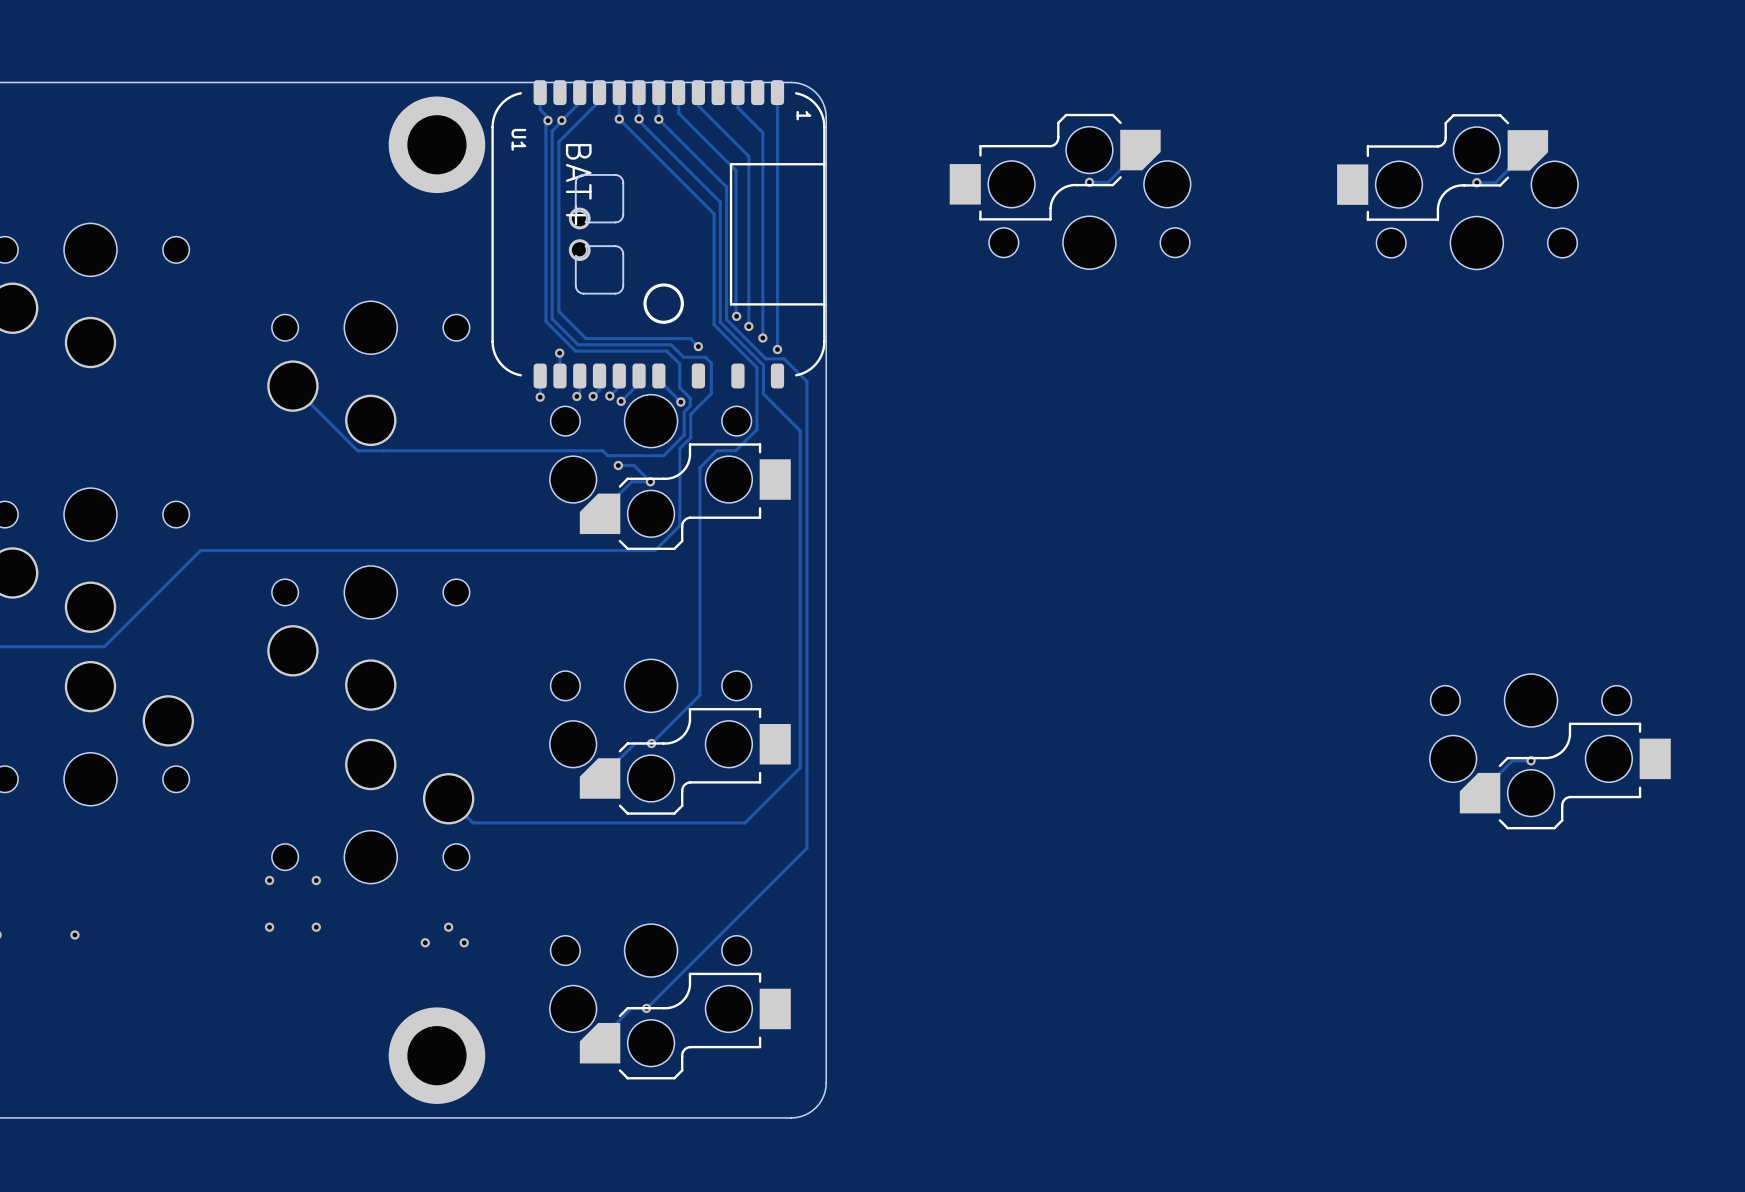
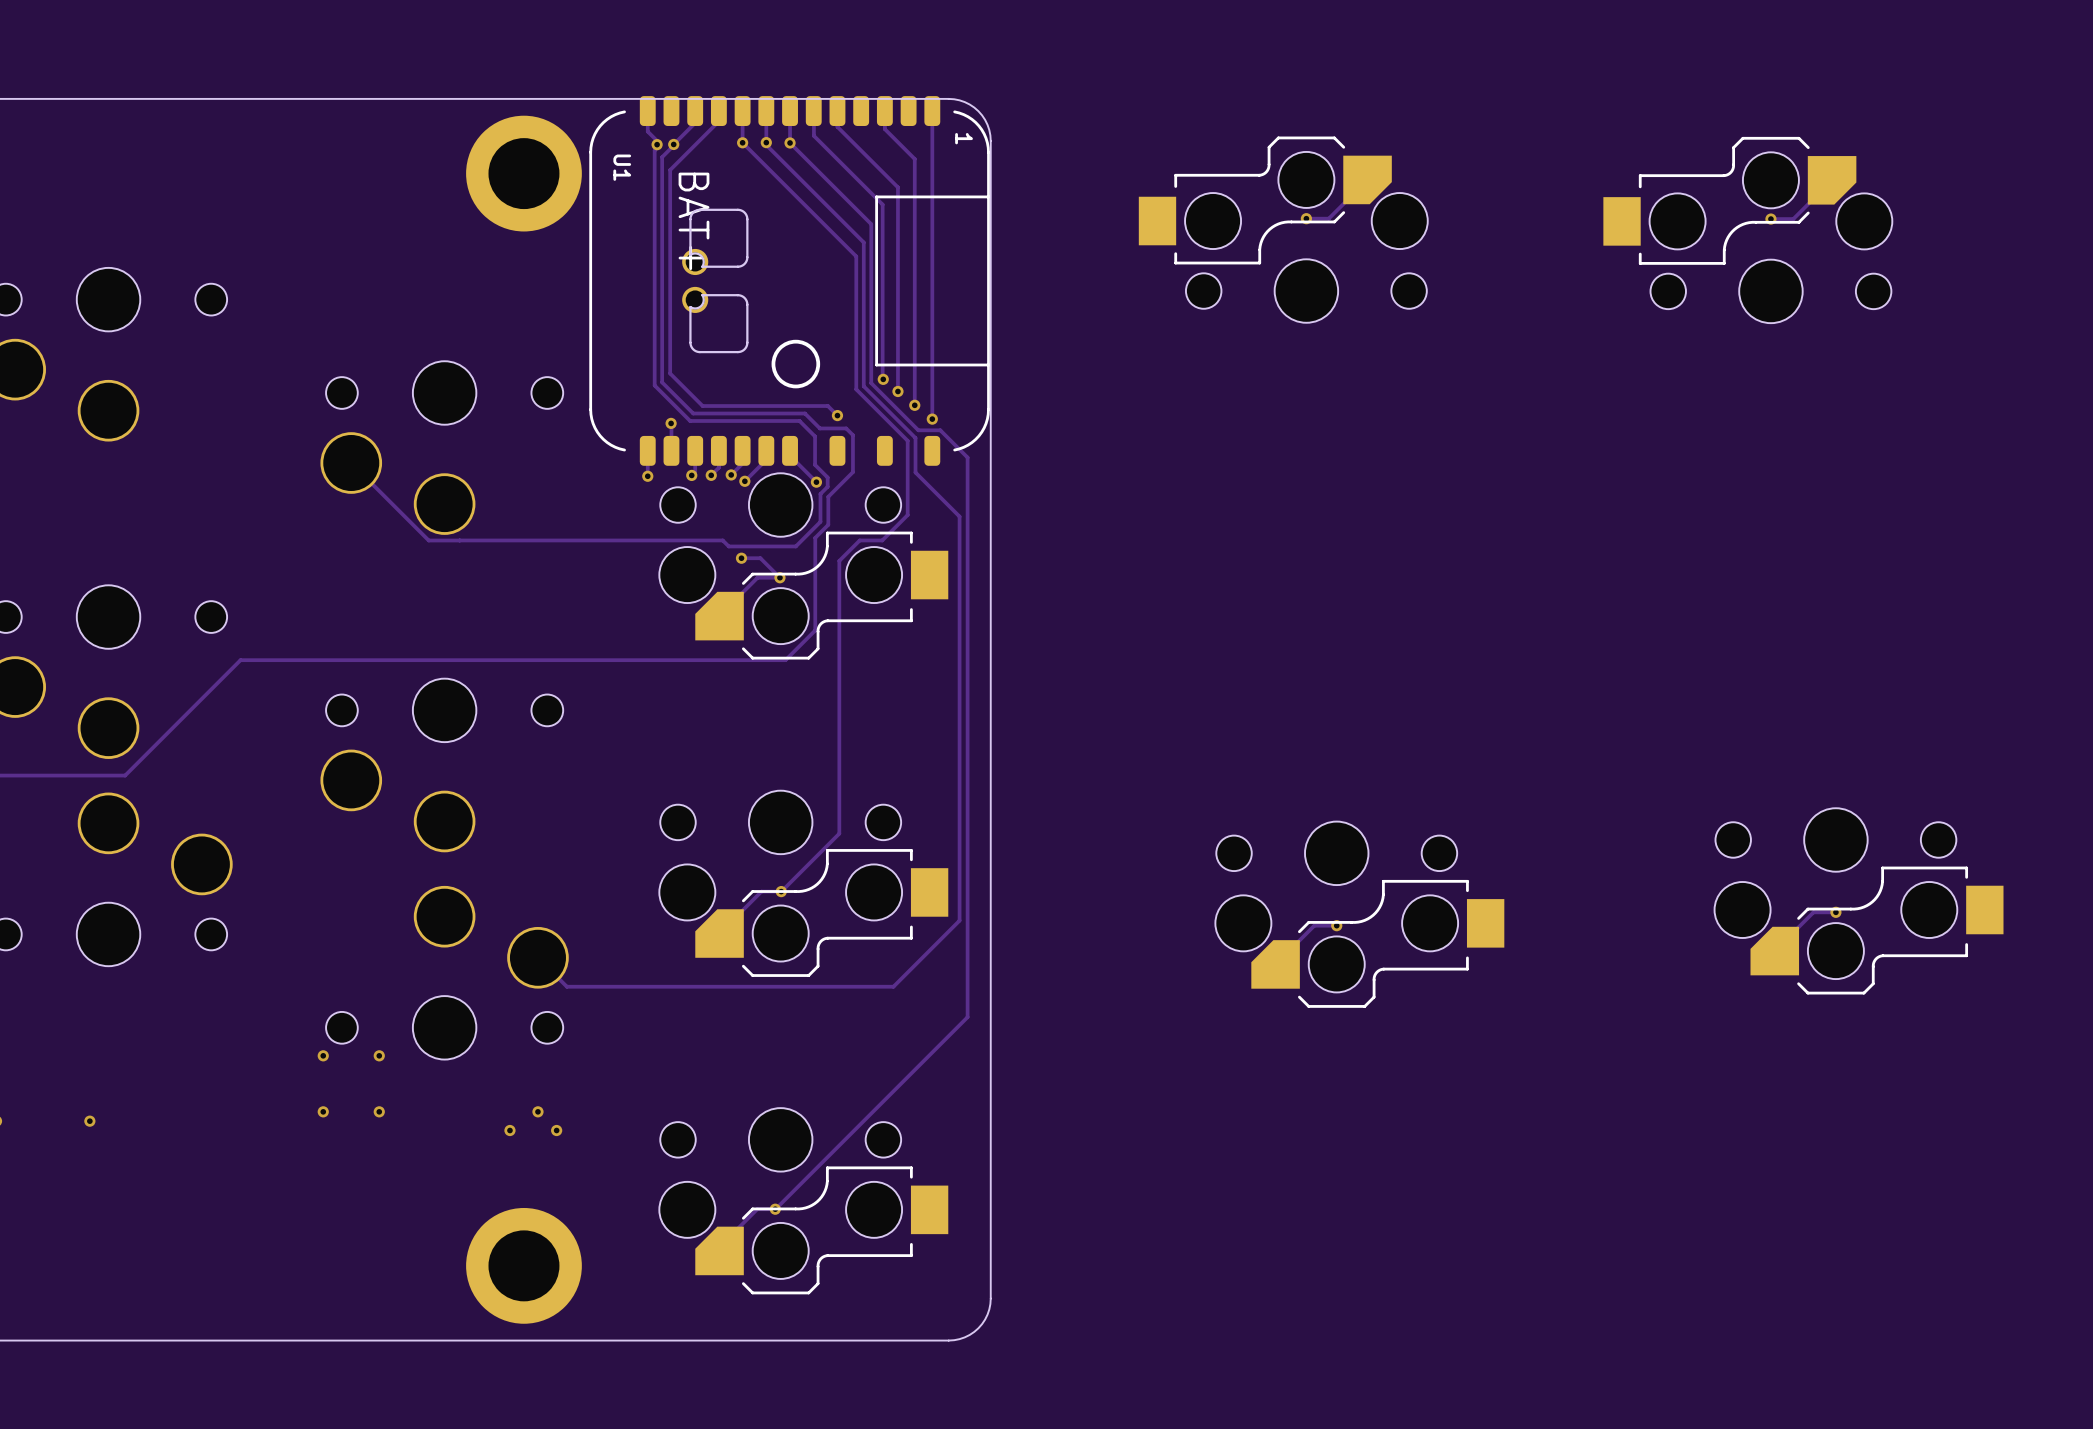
part: none -> (1359, 914)
track: none -> (1336, 925) (1314, 925) (1275, 964)
via: none -> (1336, 925)

